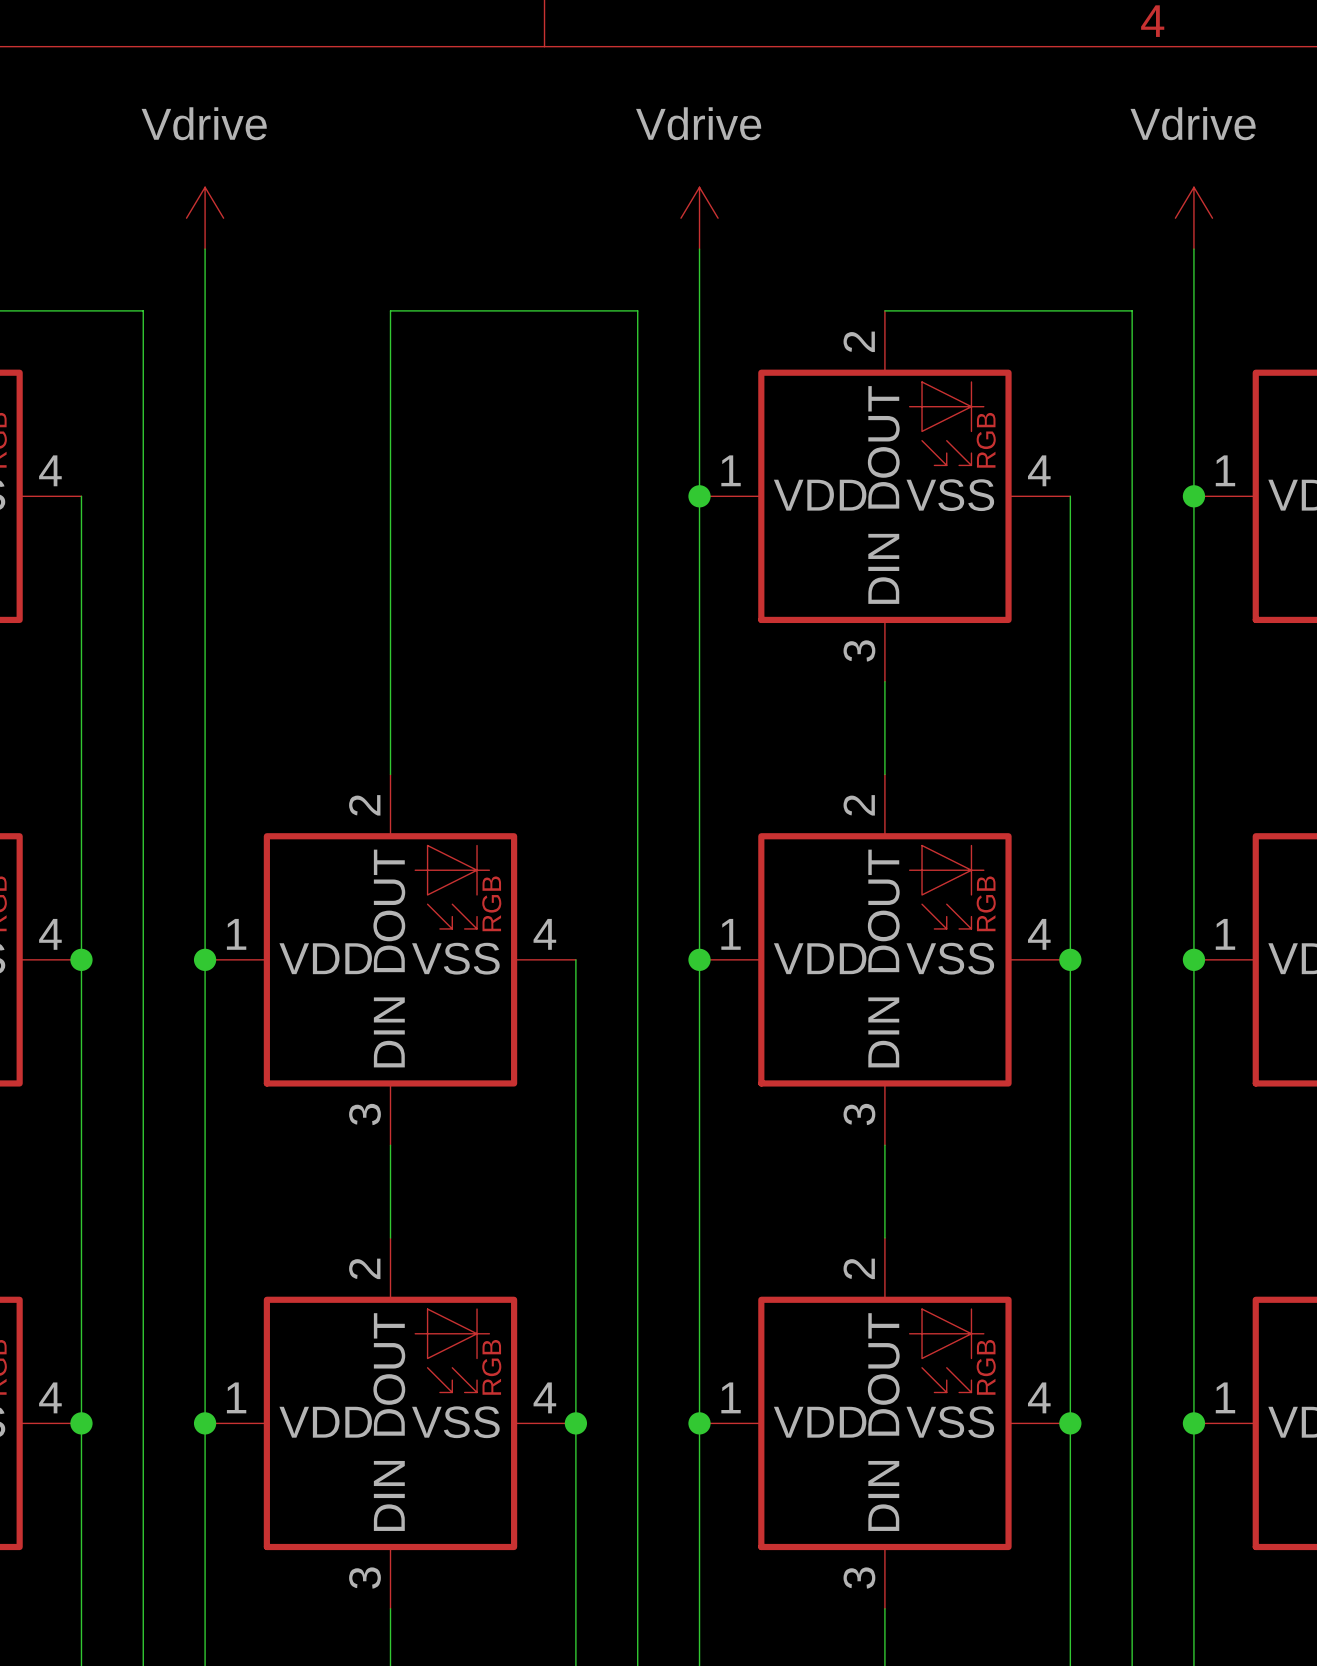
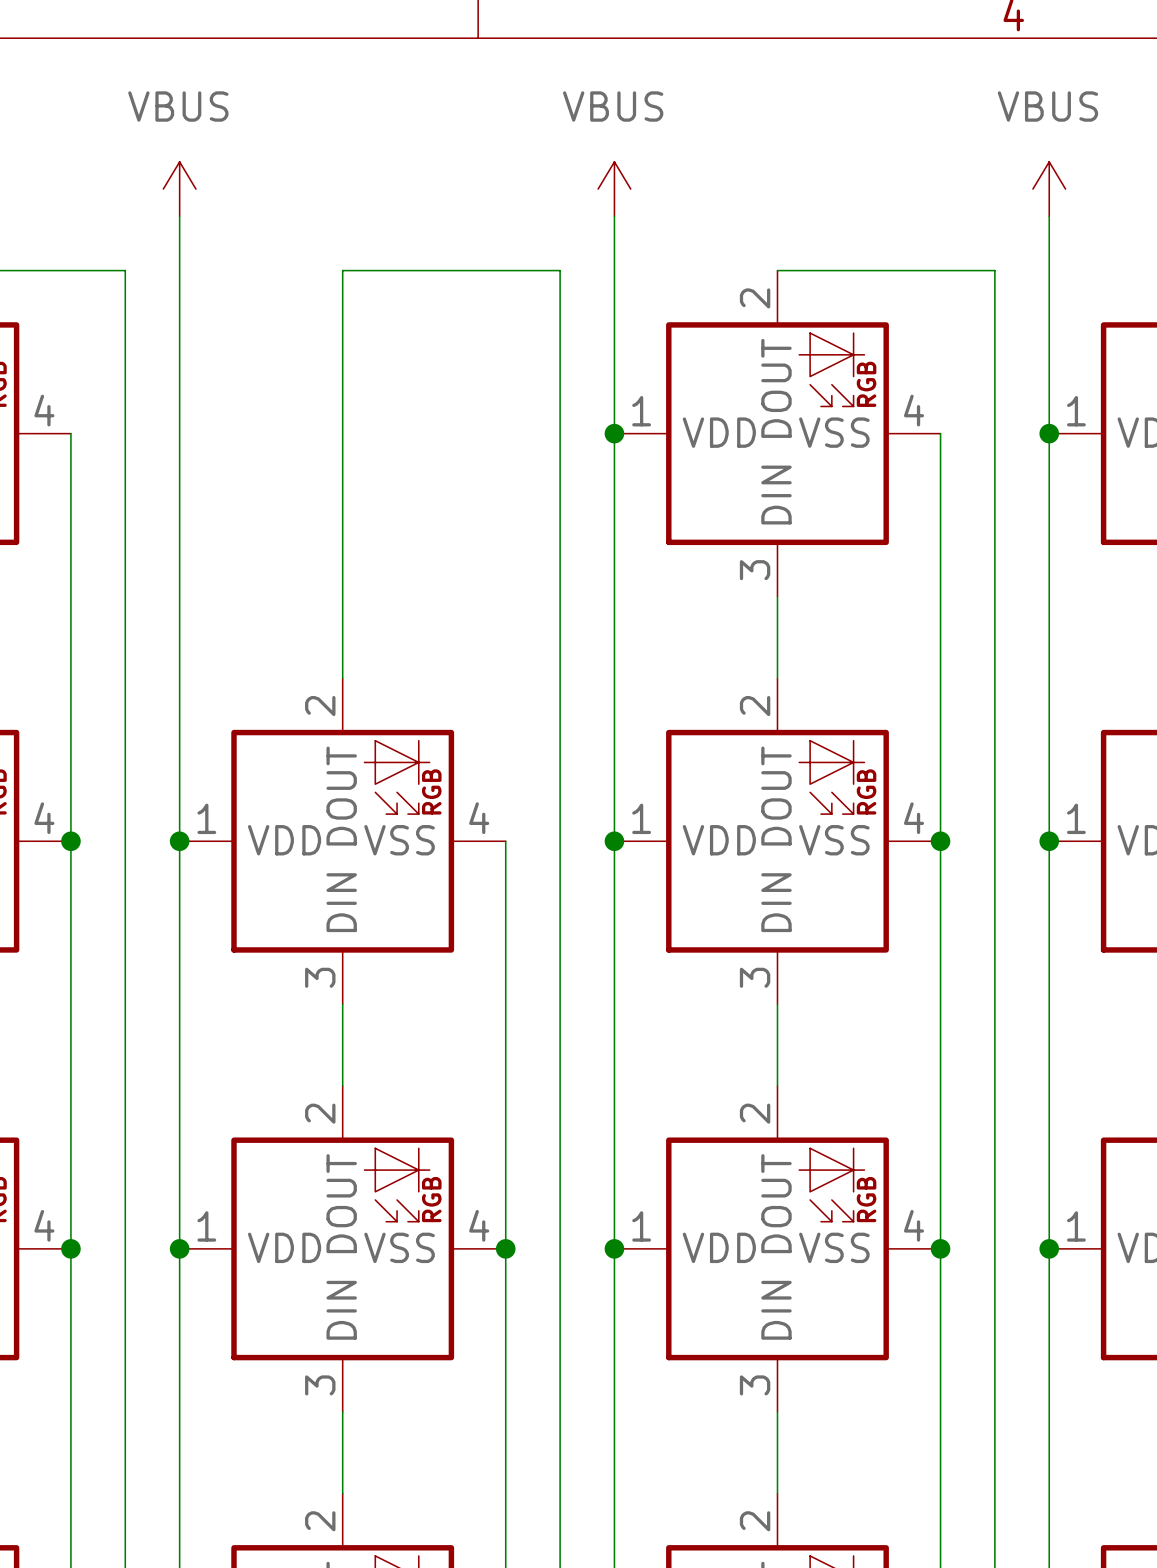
power symbol: Vdrive (205, 218) -> VBUS (179, 189)
power symbol: Vdrive (699, 218) -> VBUS (614, 189)
power symbol: Vdrive (1193, 218) -> VBUS (1049, 189)

